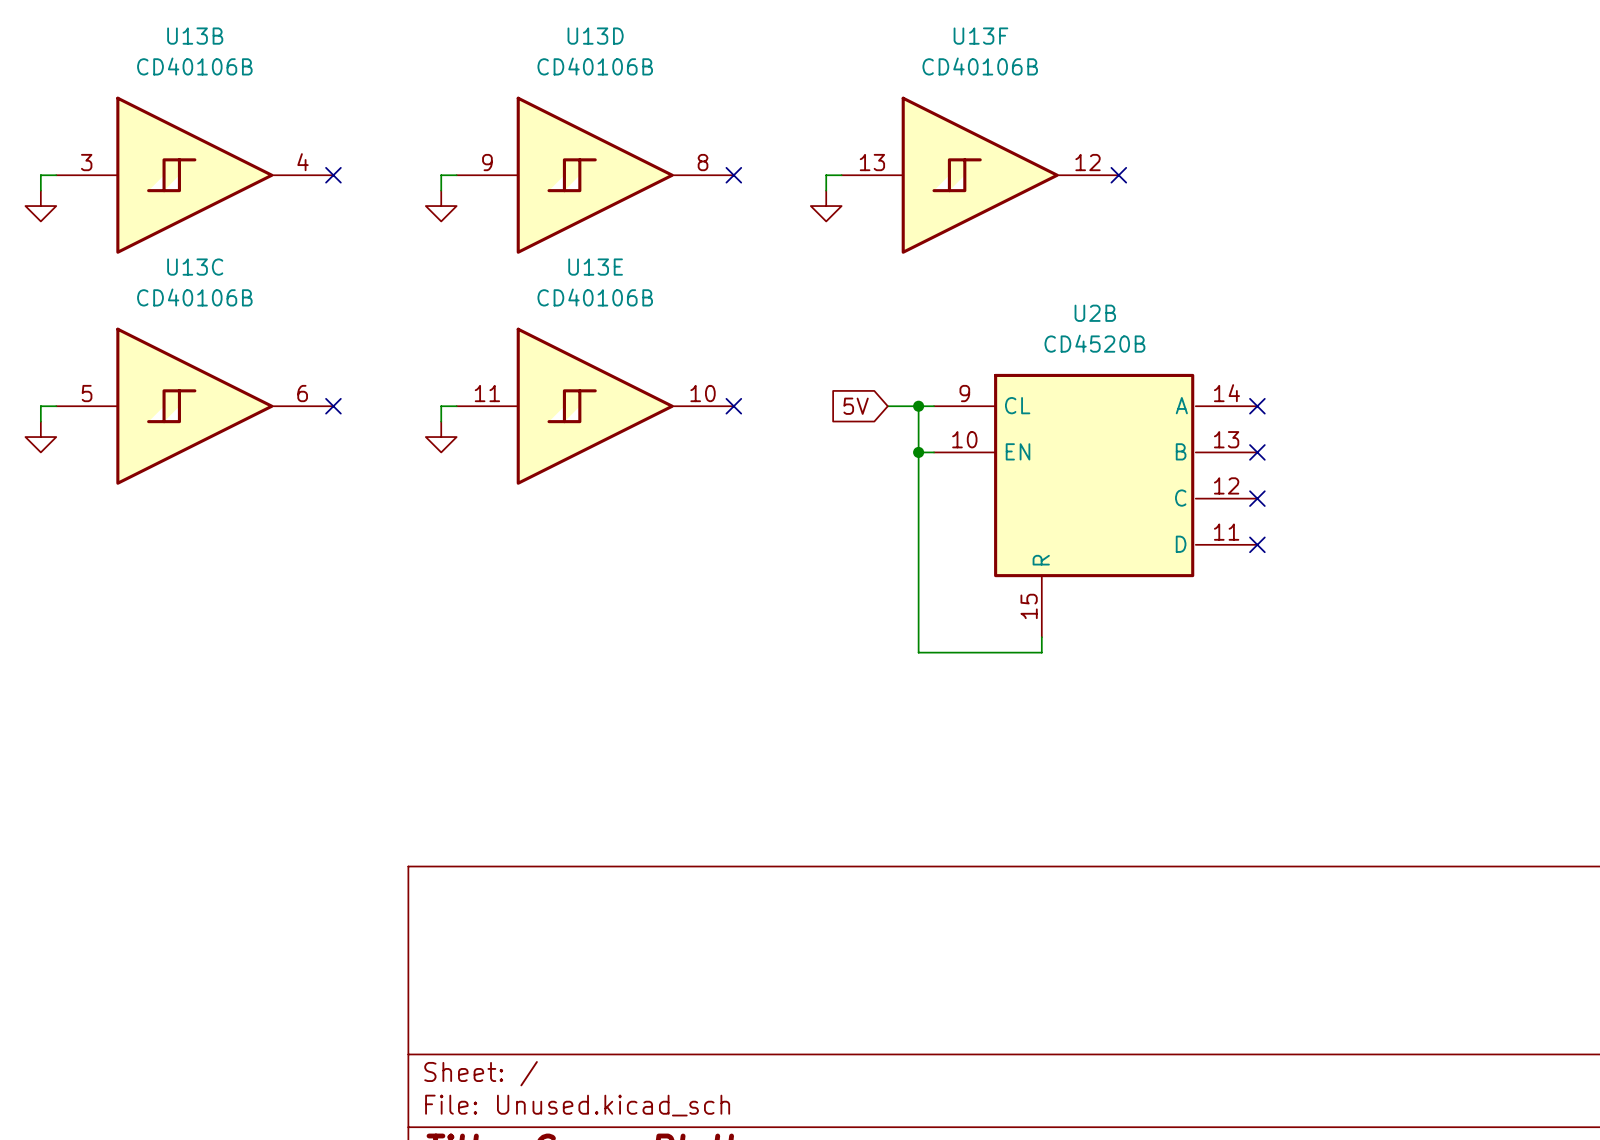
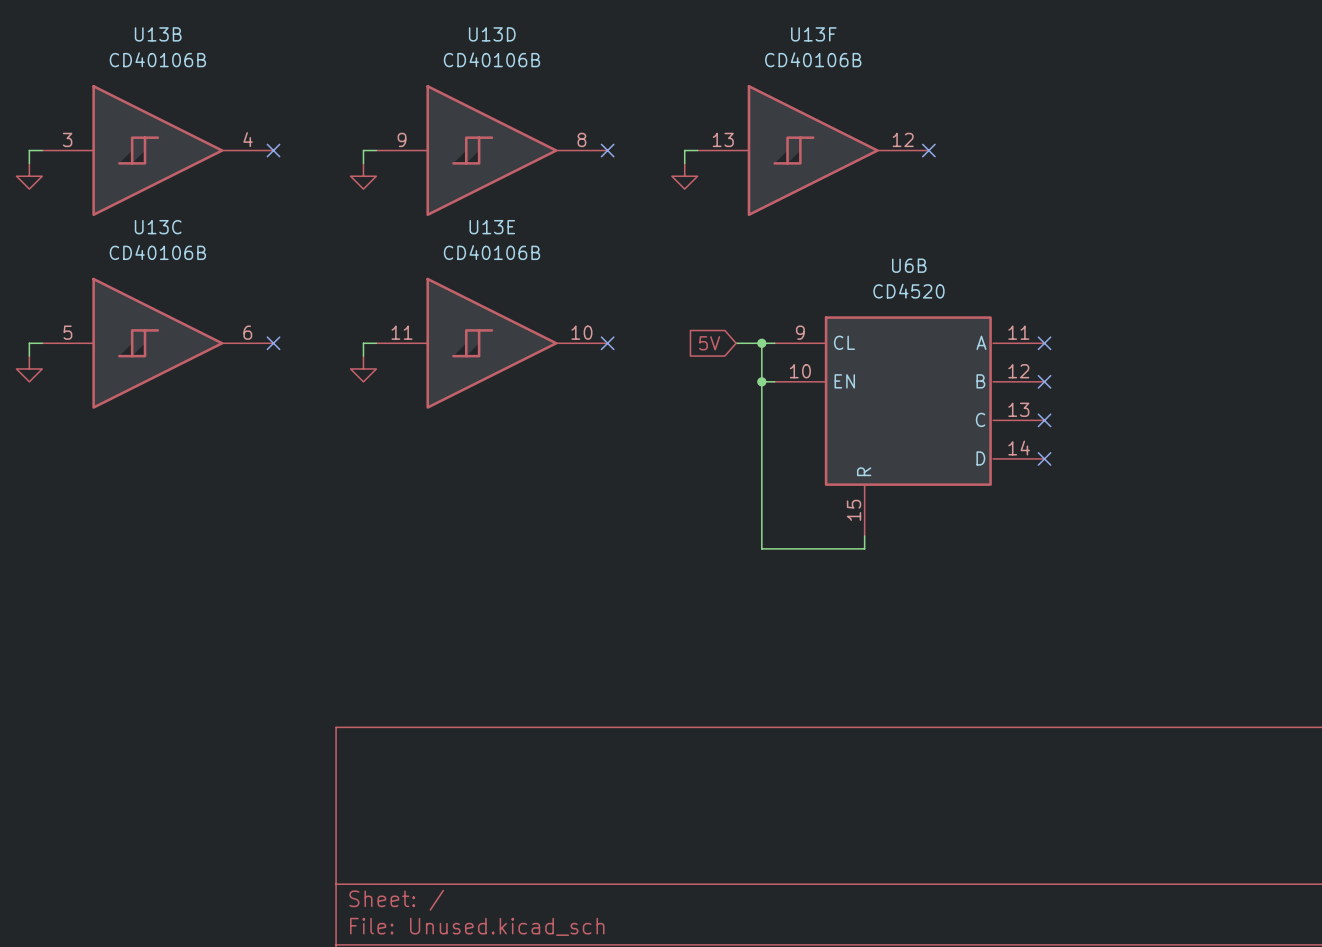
U2B name: U2B (1095, 313) -> U6B (909, 265)
U2B value: CD4520B (1094, 343) -> CD4520 (908, 291)
U2B pin number: 14 (1226, 393) -> 11 (1018, 332)
U2B pin number: 13 (1226, 439) -> 12 (1018, 371)
U2B pin number: 12 (1226, 485) -> 13 (1018, 409)
U2B pin number: 11 (1226, 532) -> 14 (1019, 448)

